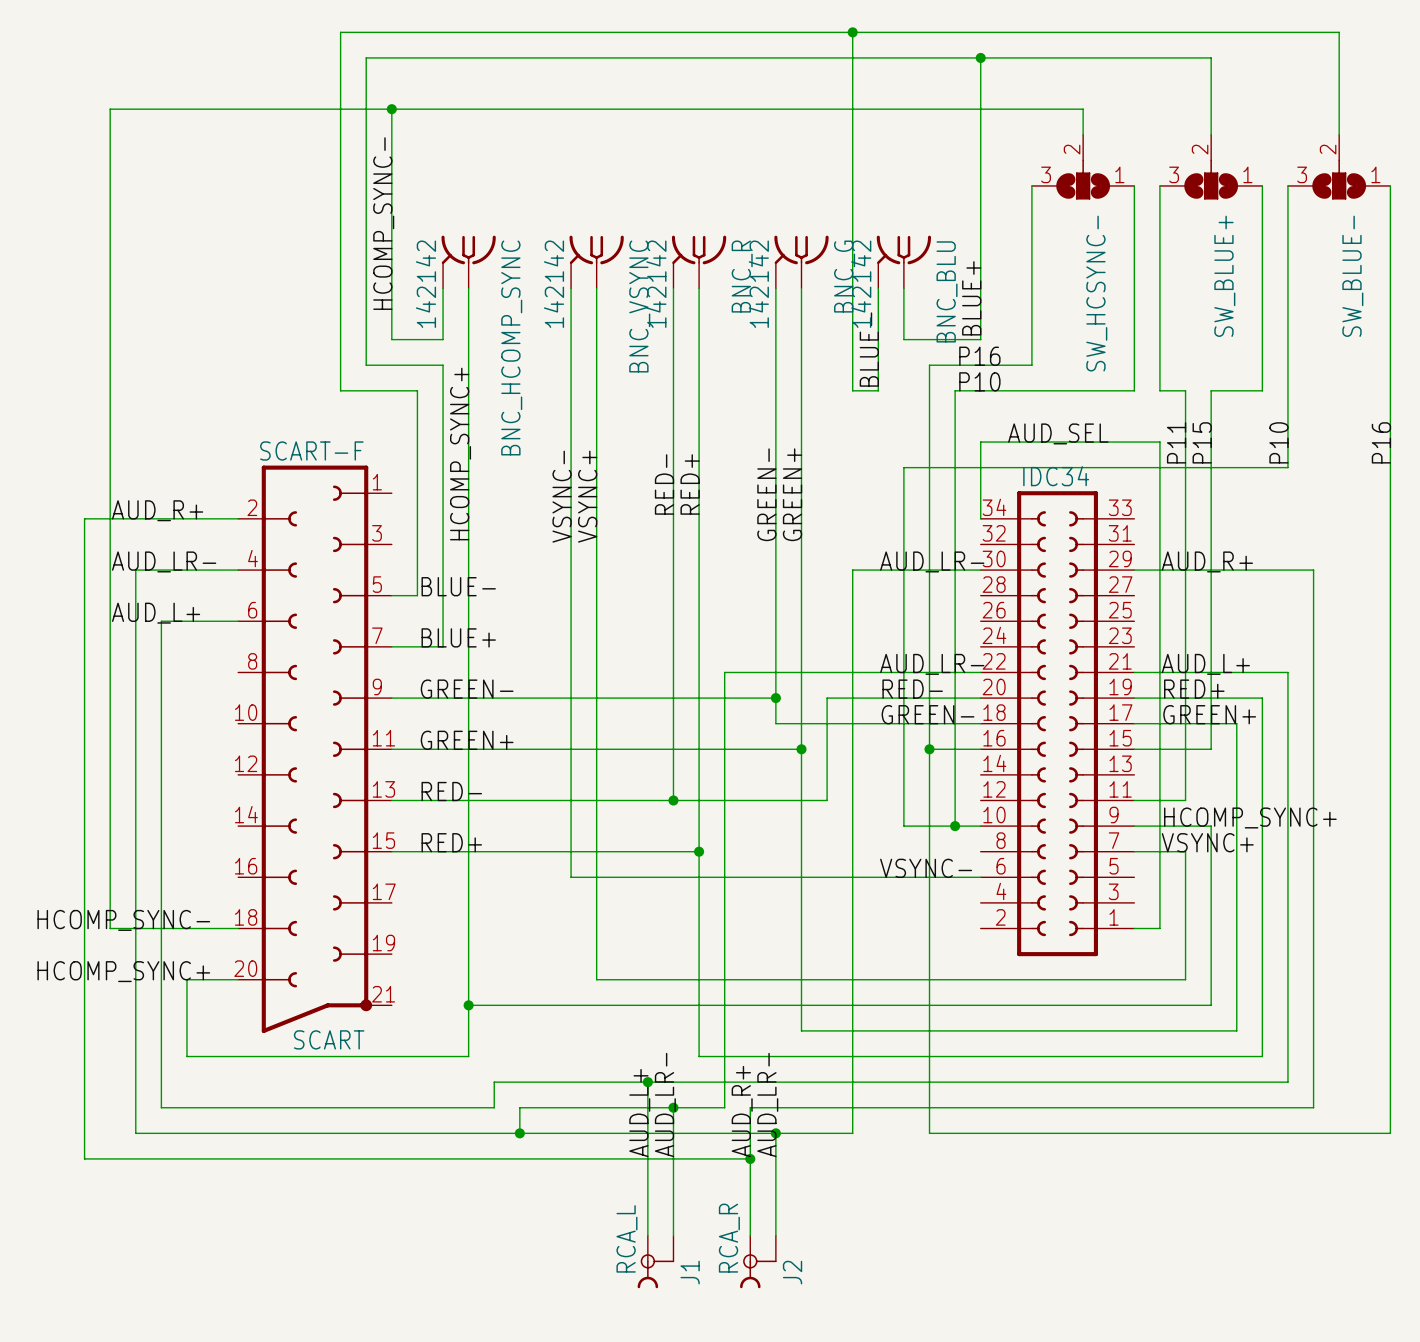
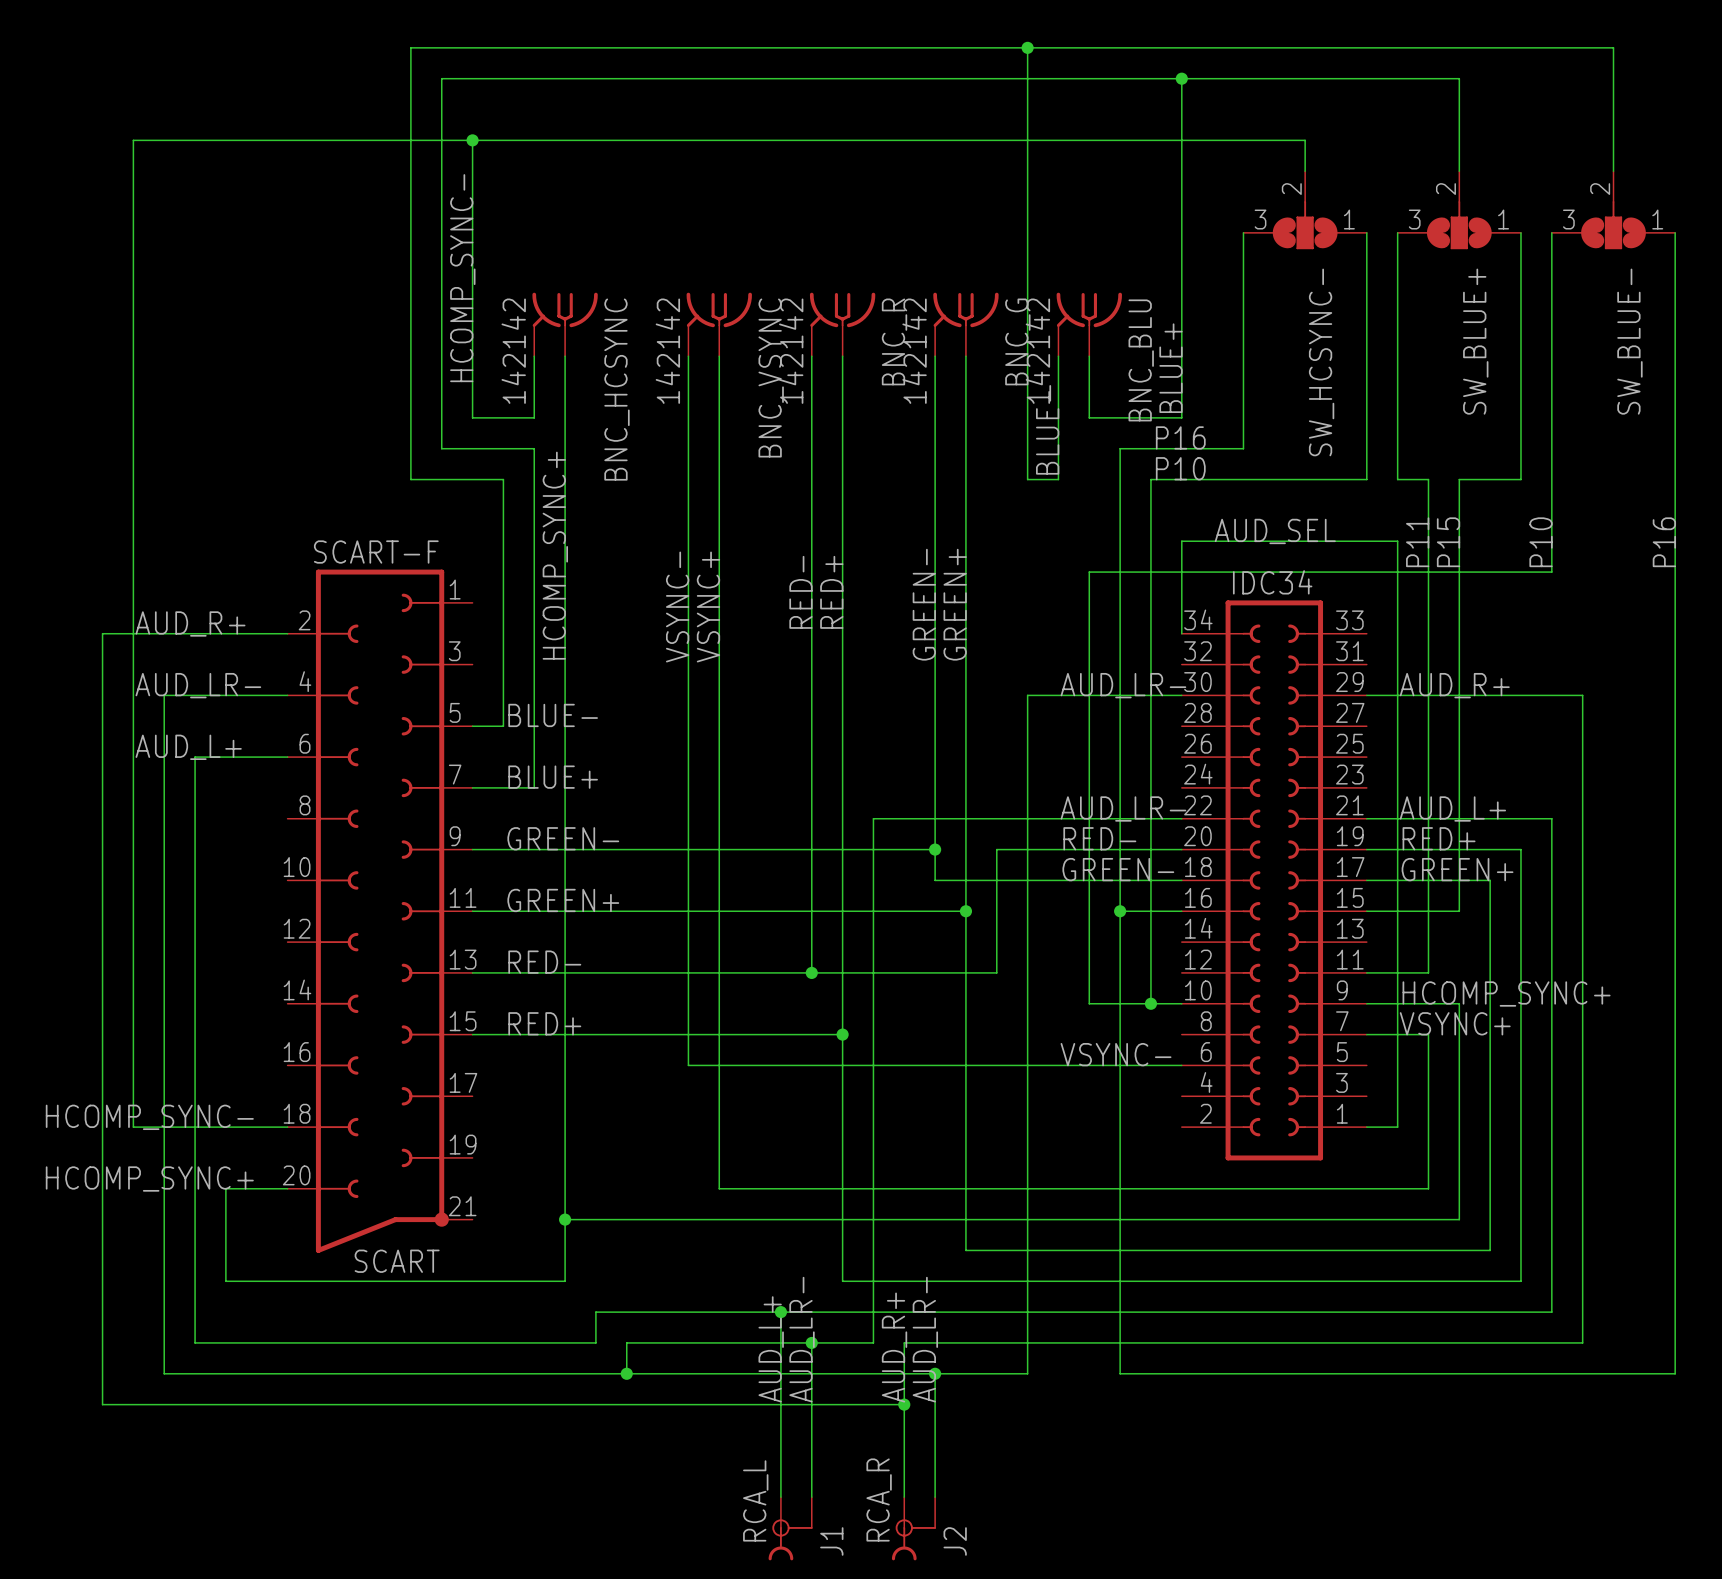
BNC_HCOMP_SYNC name: BNC_HCOMP_SYNC (511, 347) -> BNC_HCSYNC (616, 389)

